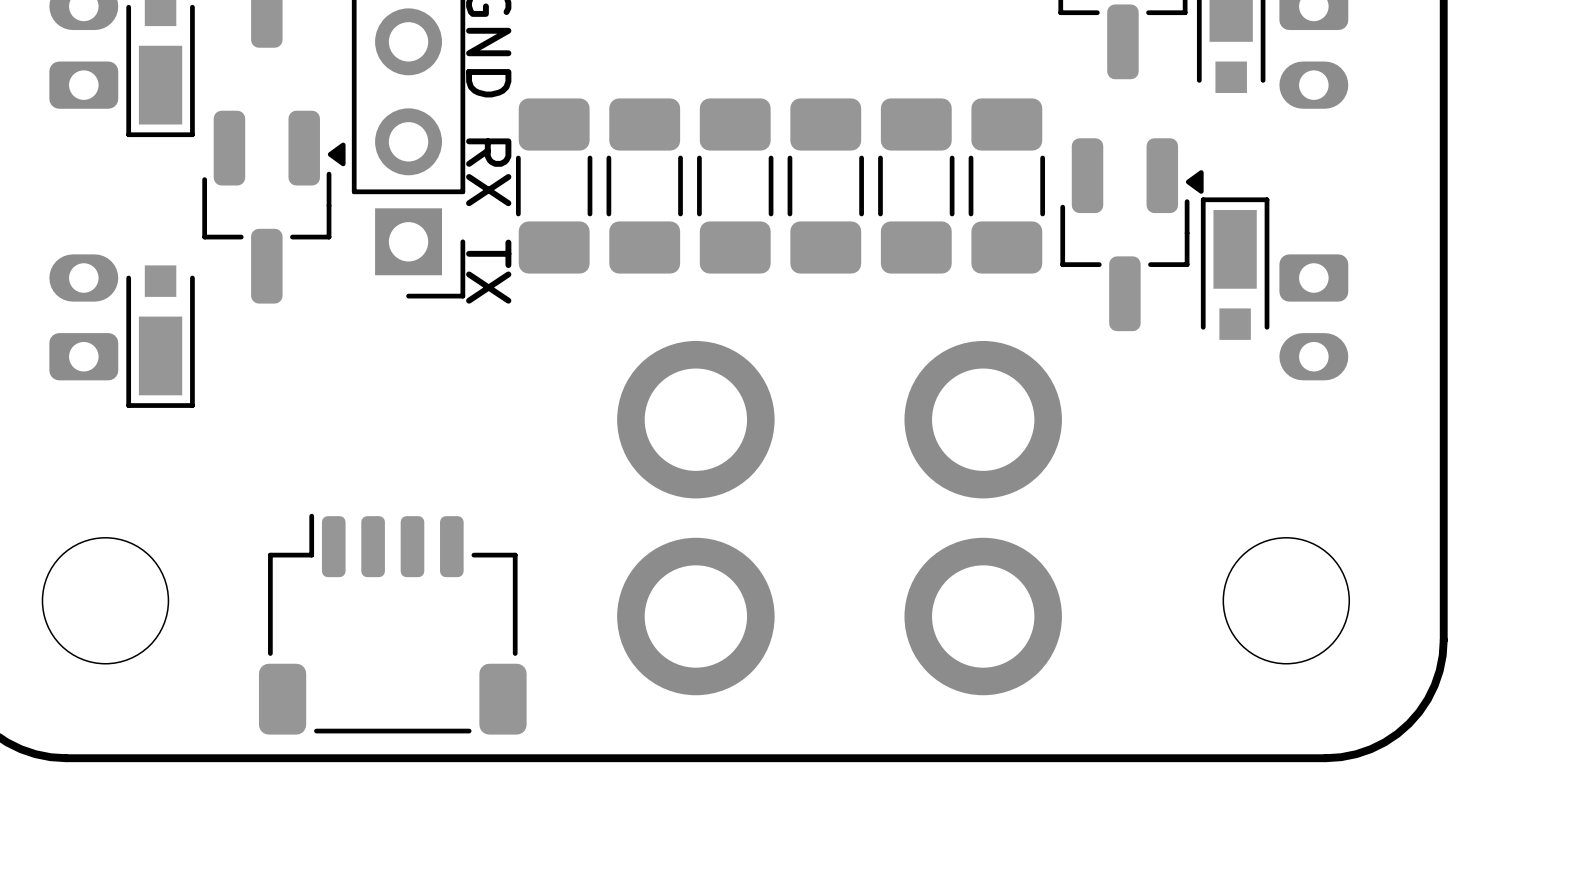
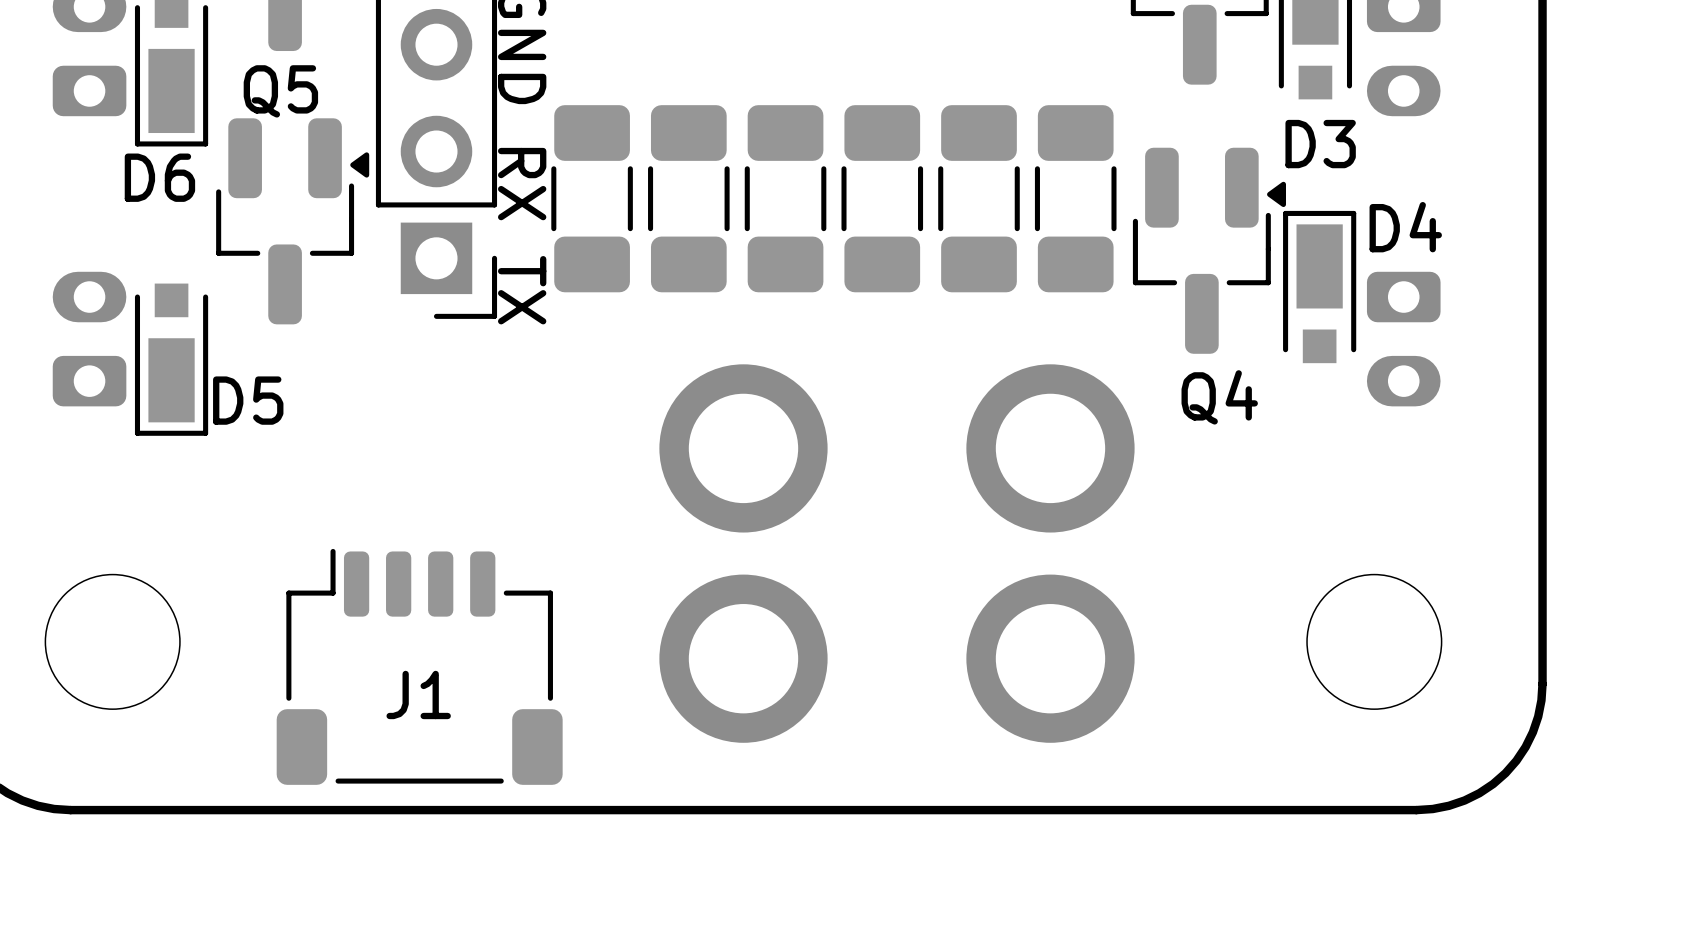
Q5 name: none -> Q5 (280, 91)
D3 name: none -> D3 (1320, 144)
D6 name: none -> D6 (159, 177)
D4 name: none -> D4 (1405, 227)
Q4 name: none -> Q4 (1219, 397)
D5 name: none -> D5 (248, 400)
J1 name: none -> J1 (418, 694)

